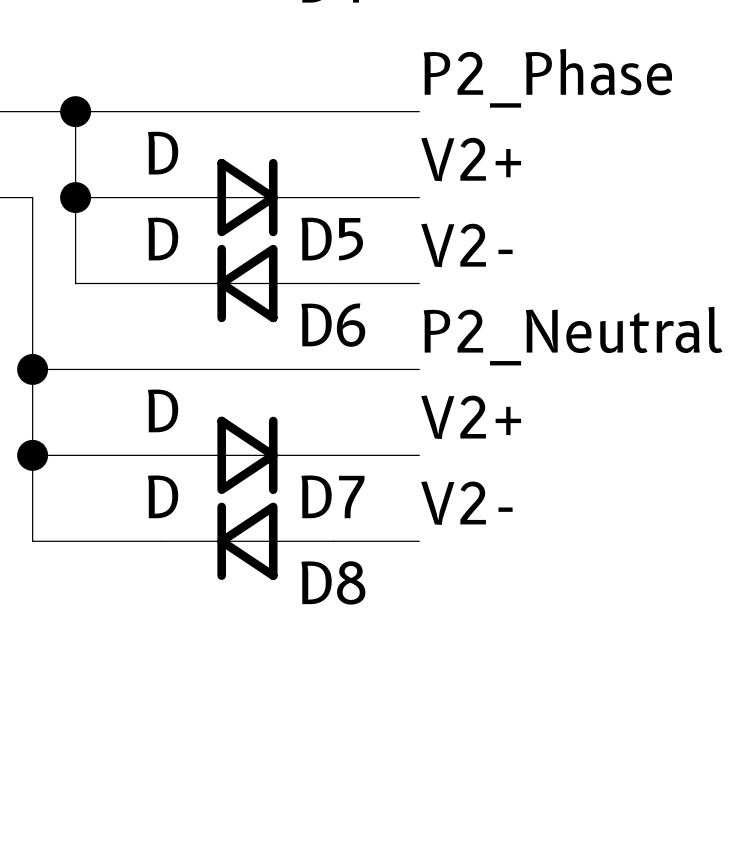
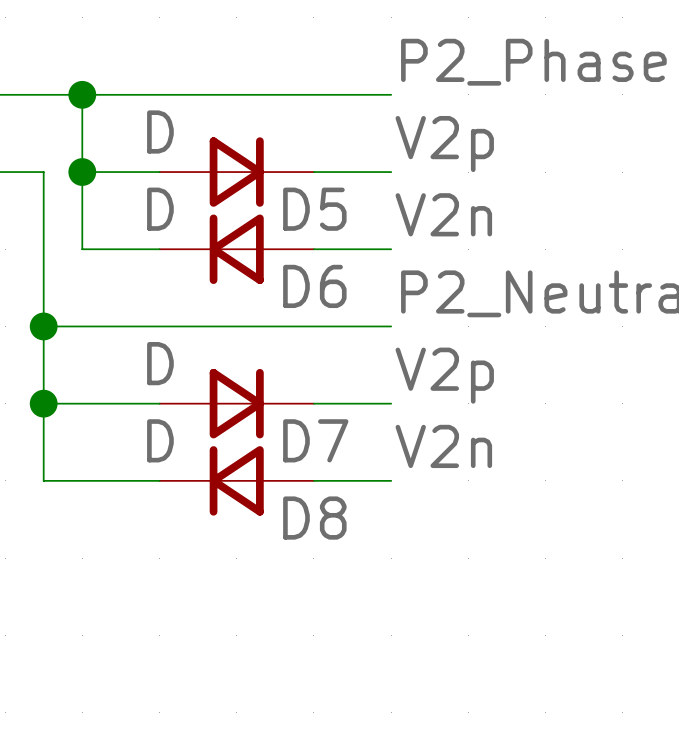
label: V2+ (471, 159) -> V2p (444, 144)
label: V2- (466, 245) -> V2n (443, 214)
label: V2+ (471, 417) -> V2p (444, 375)
label: V2- (466, 503) -> V2n (443, 446)

